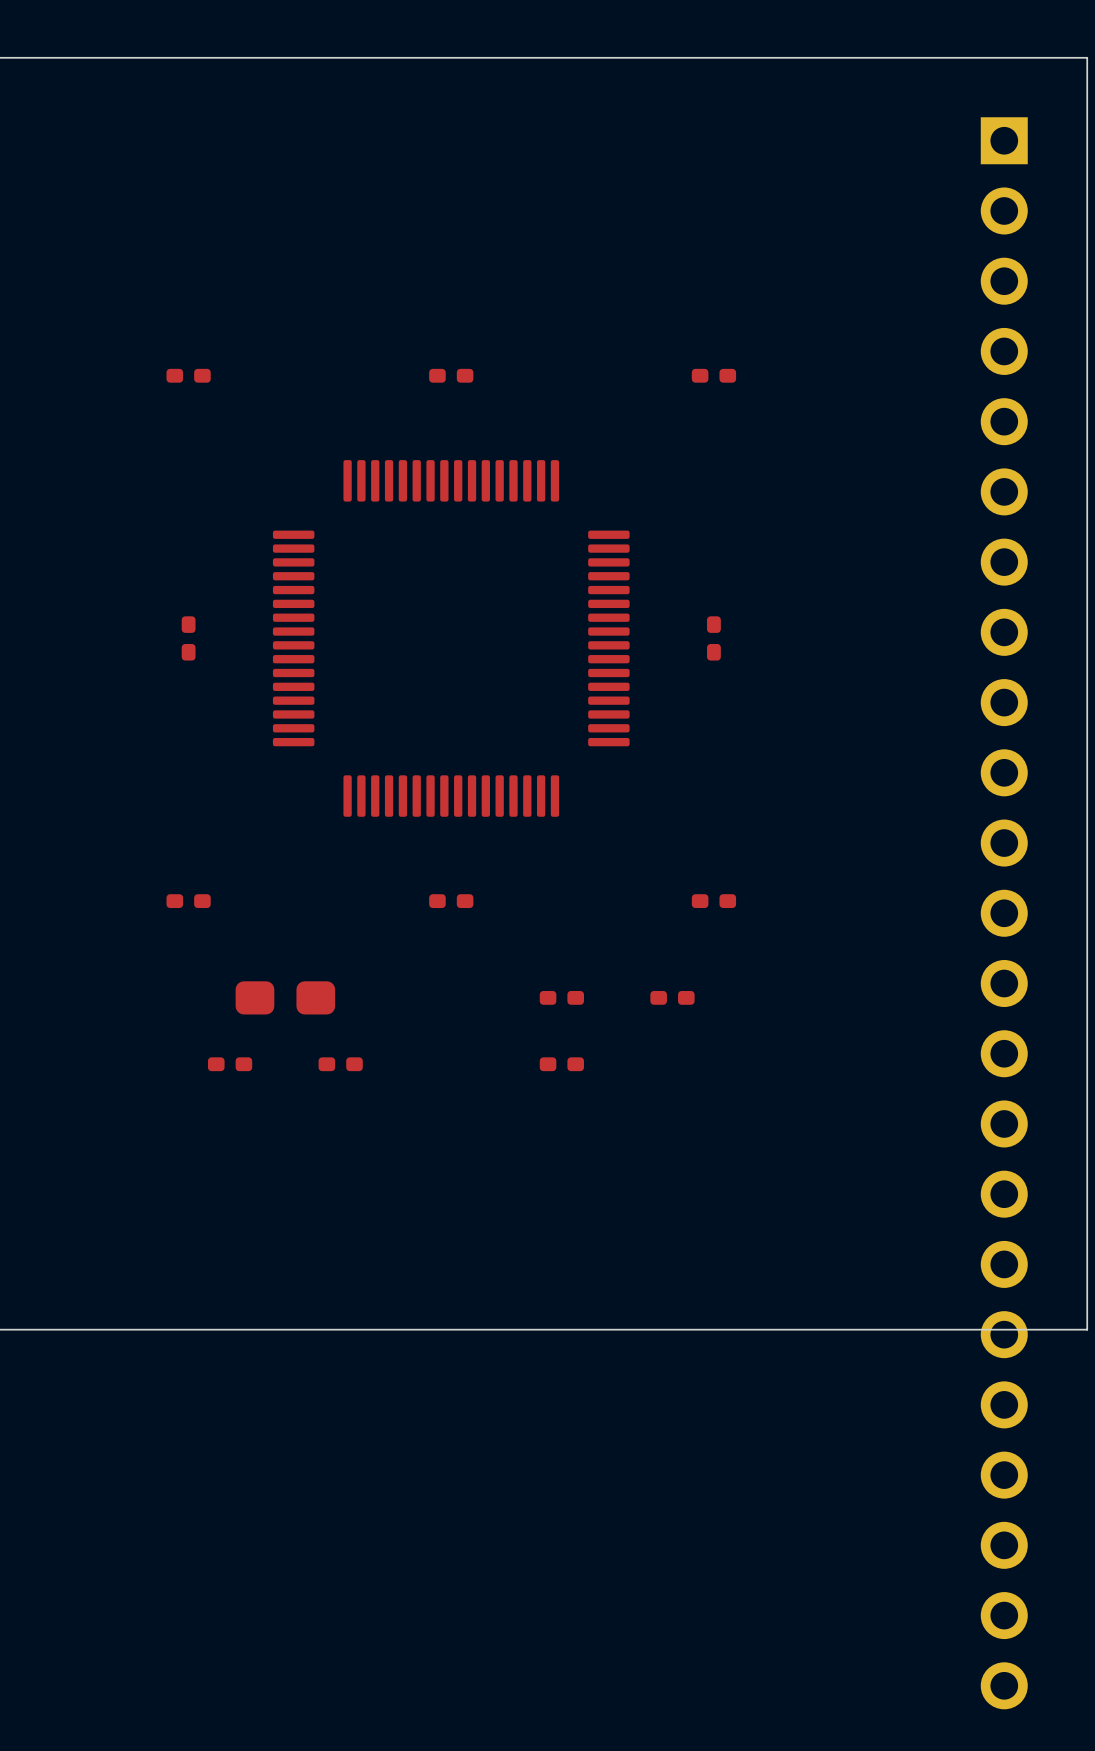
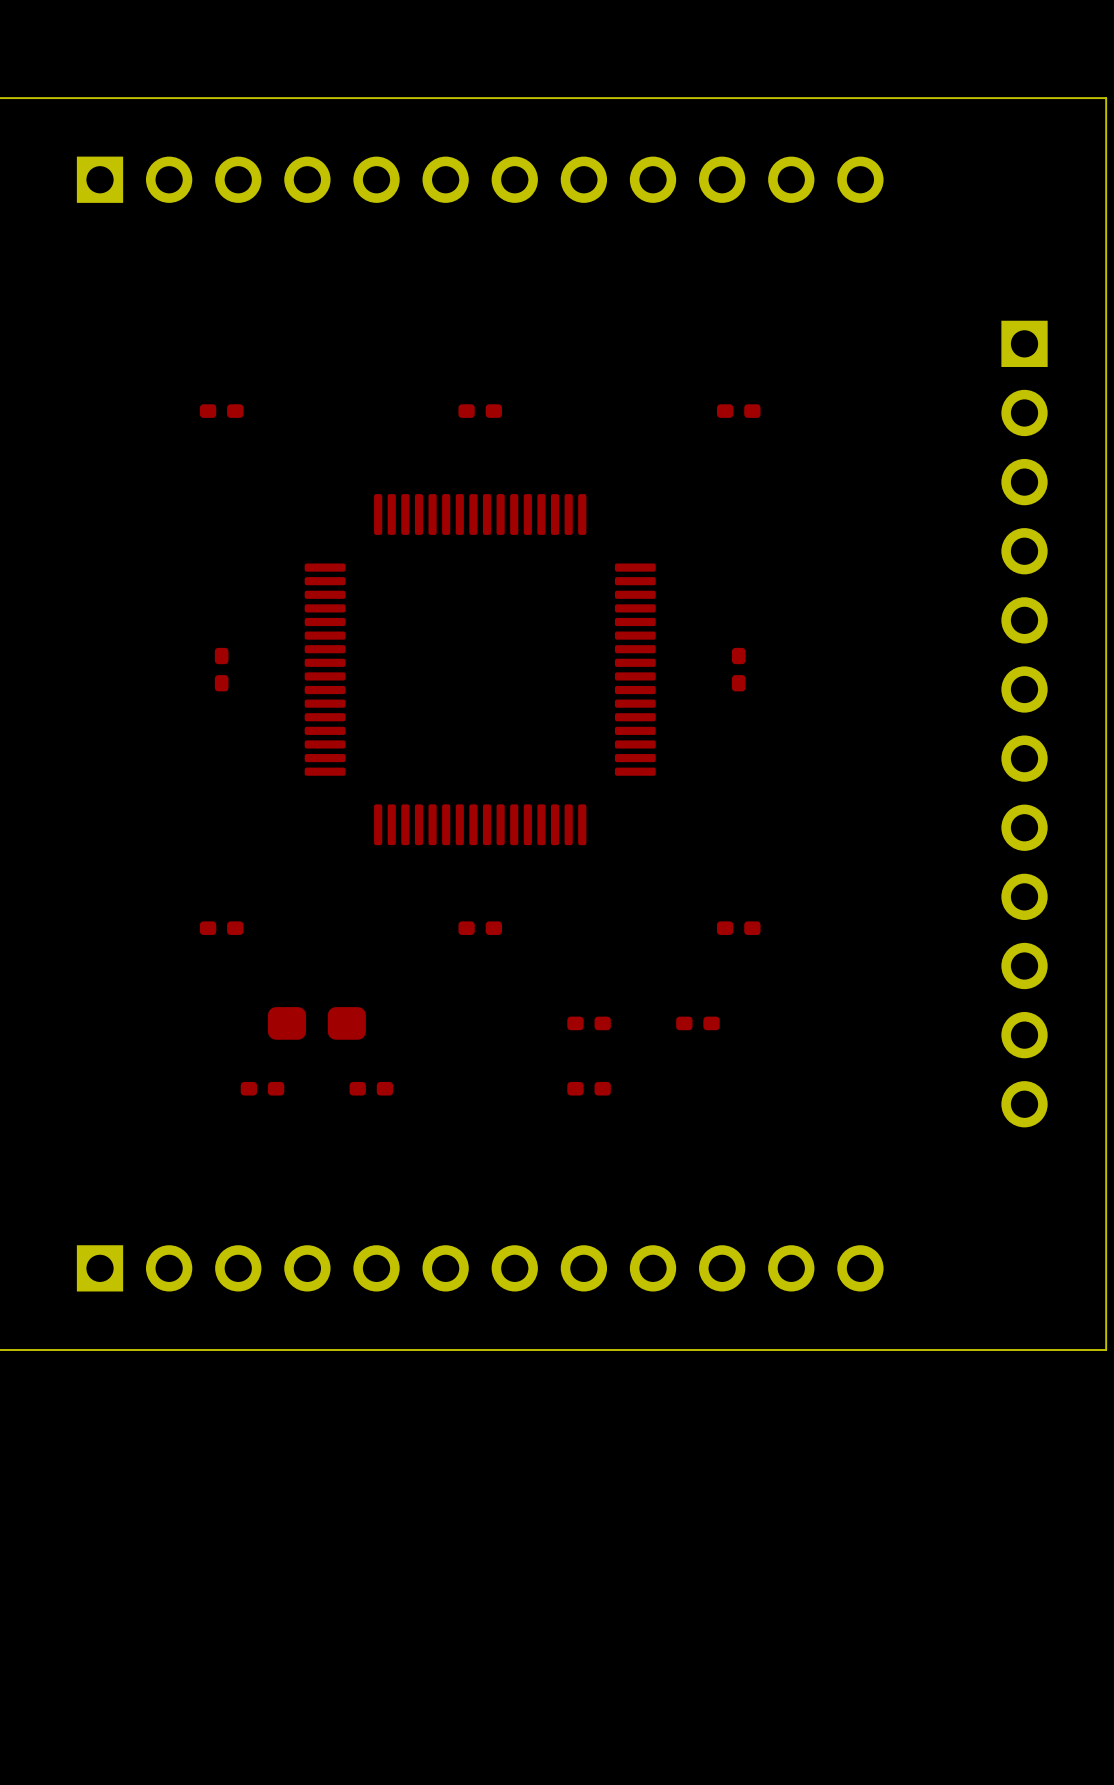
part: none -> (480, 179)
part: none -> (1024, 724)
part: (1004, 913) -> none
part: none -> (480, 1268)

